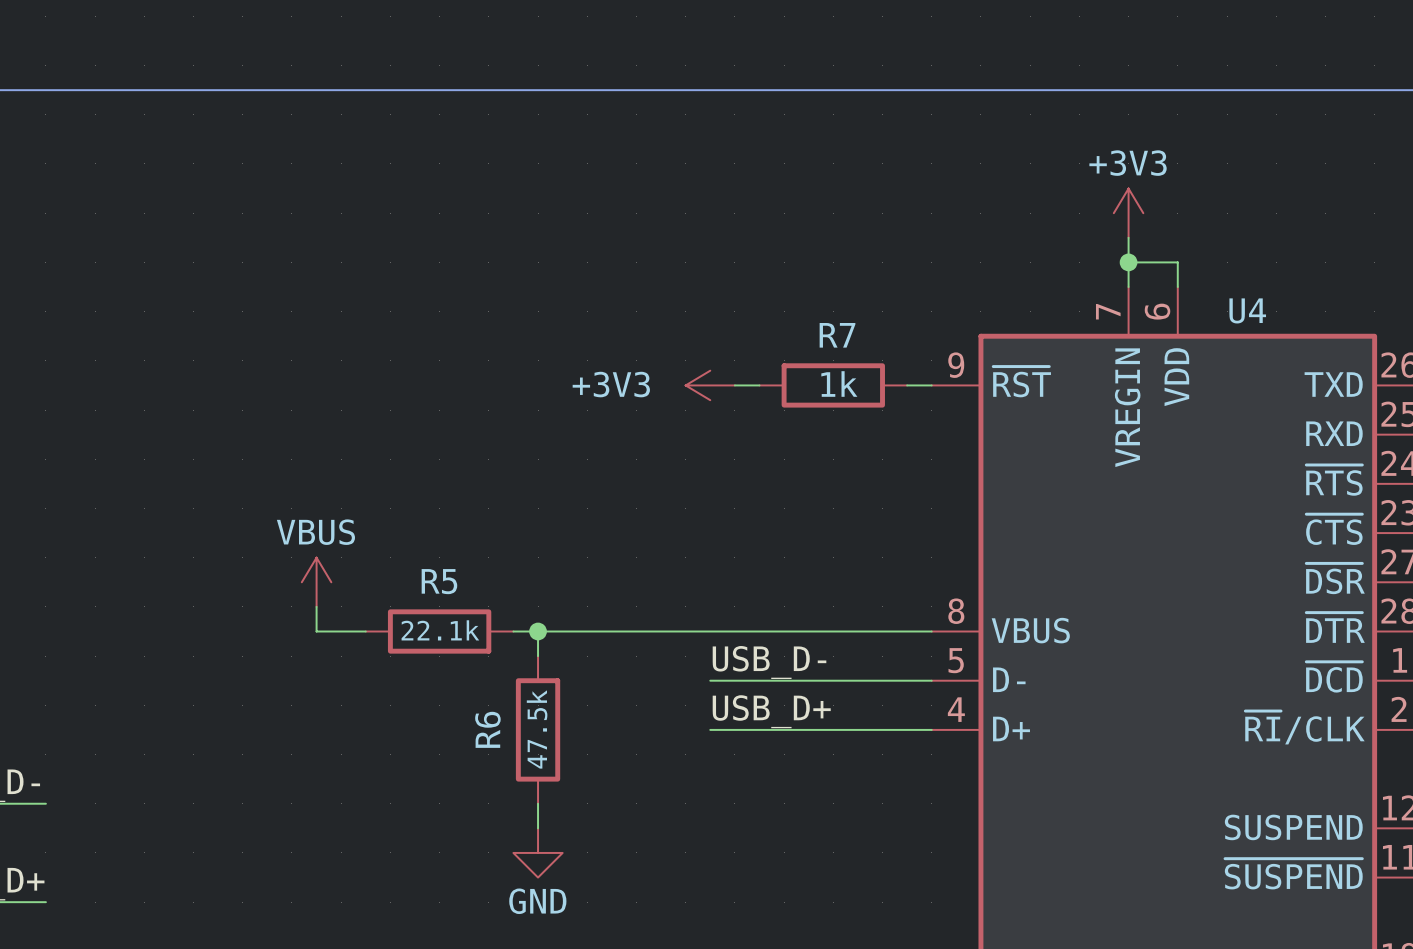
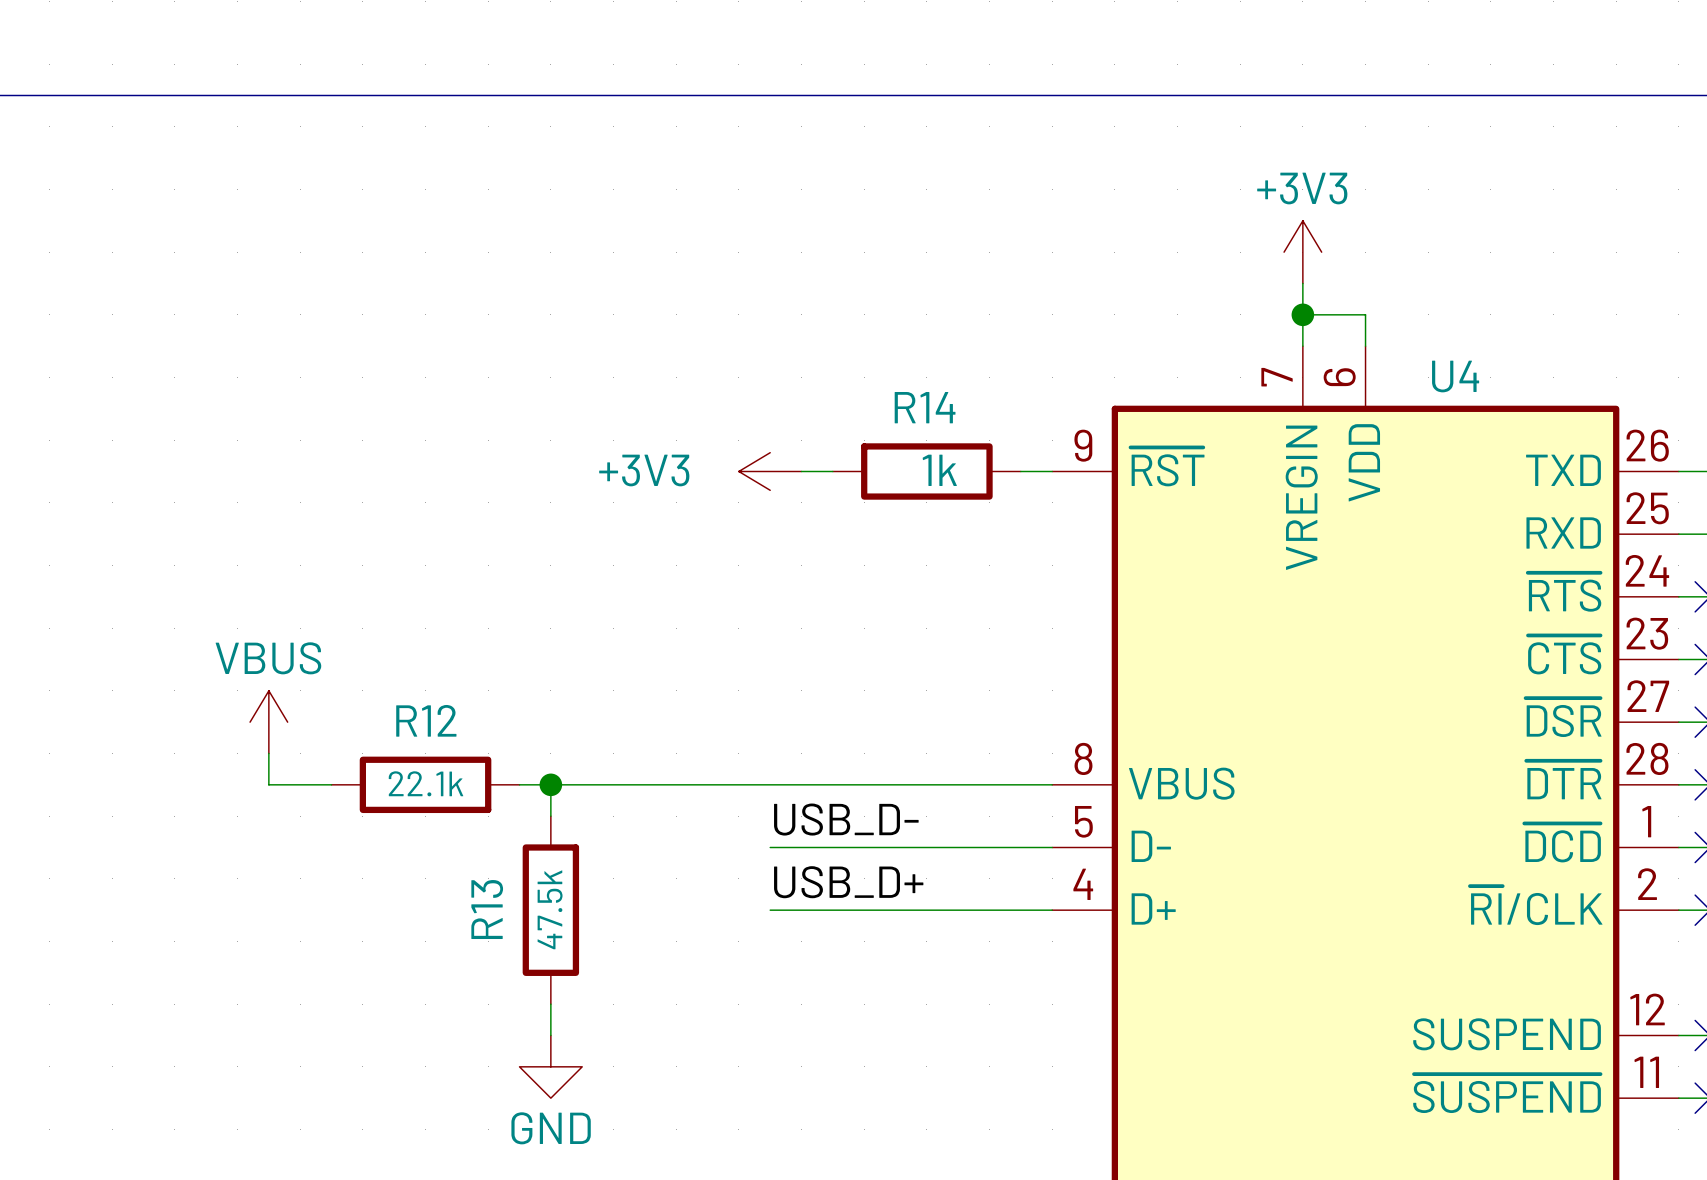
R7 name: R7 (837, 335) -> R14 (925, 407)
R5 name: R5 (439, 581) -> R12 (426, 720)
R6 name: R6 (487, 729) -> R13 (487, 909)

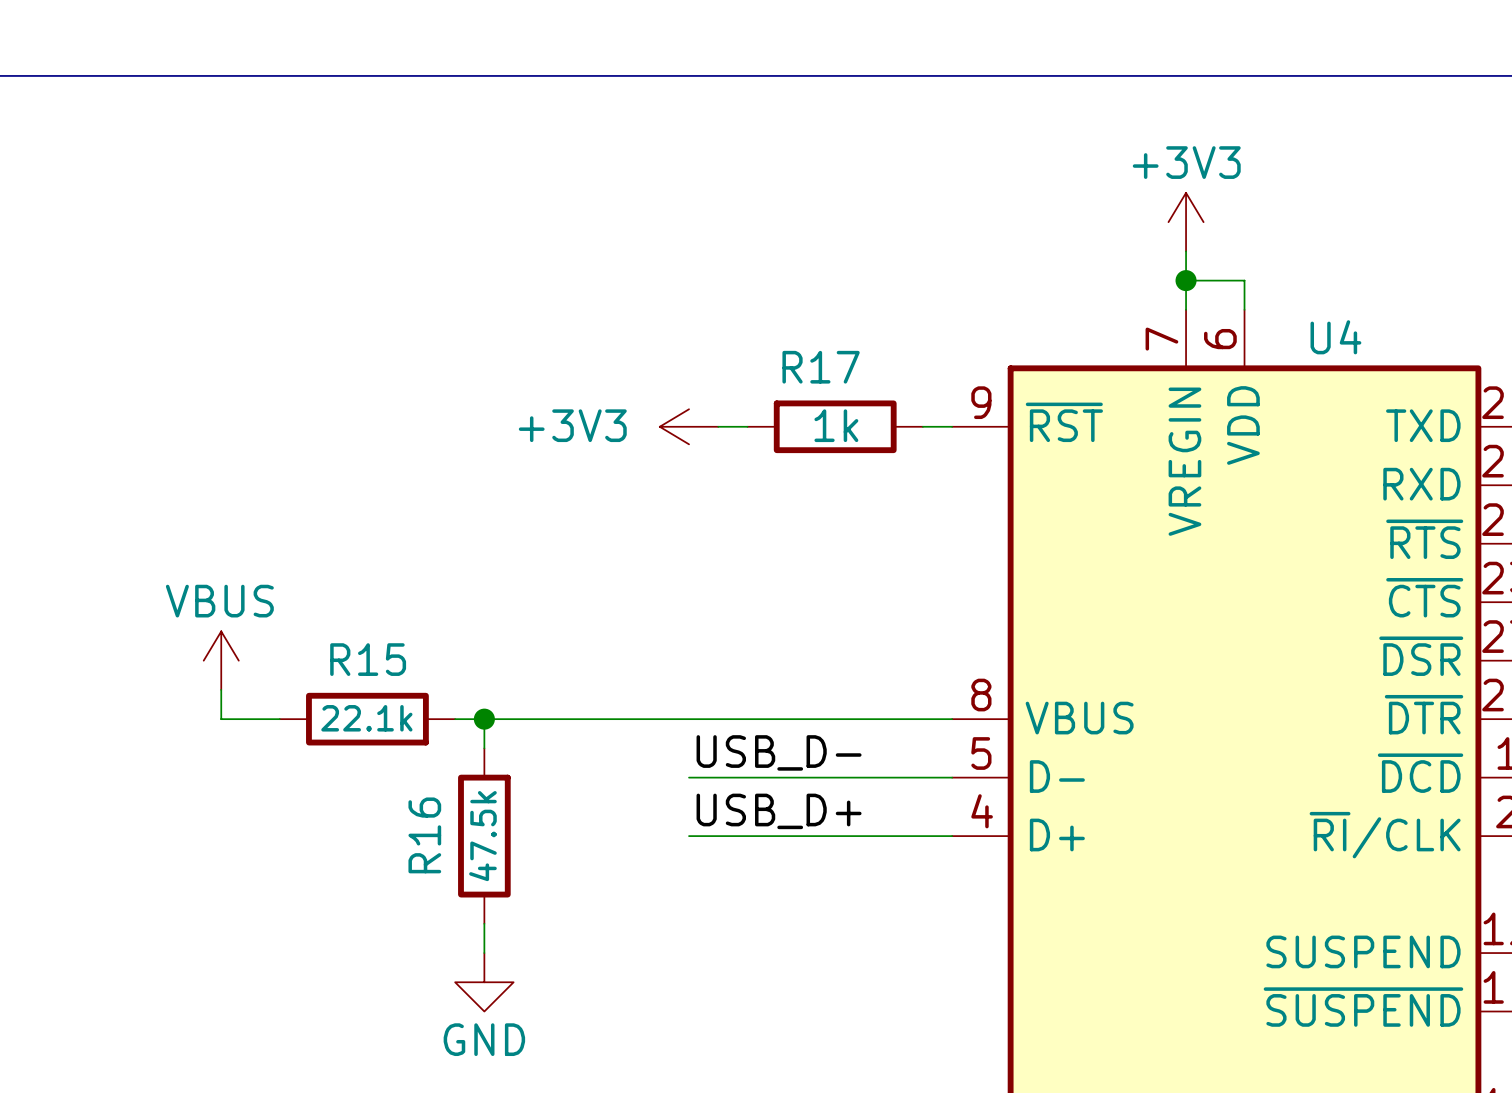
R14 name: R14 (925, 407) -> R17 (821, 367)
R12 name: R12 (426, 720) -> R15 (368, 659)
R13 name: R13 (487, 909) -> R16 (424, 835)

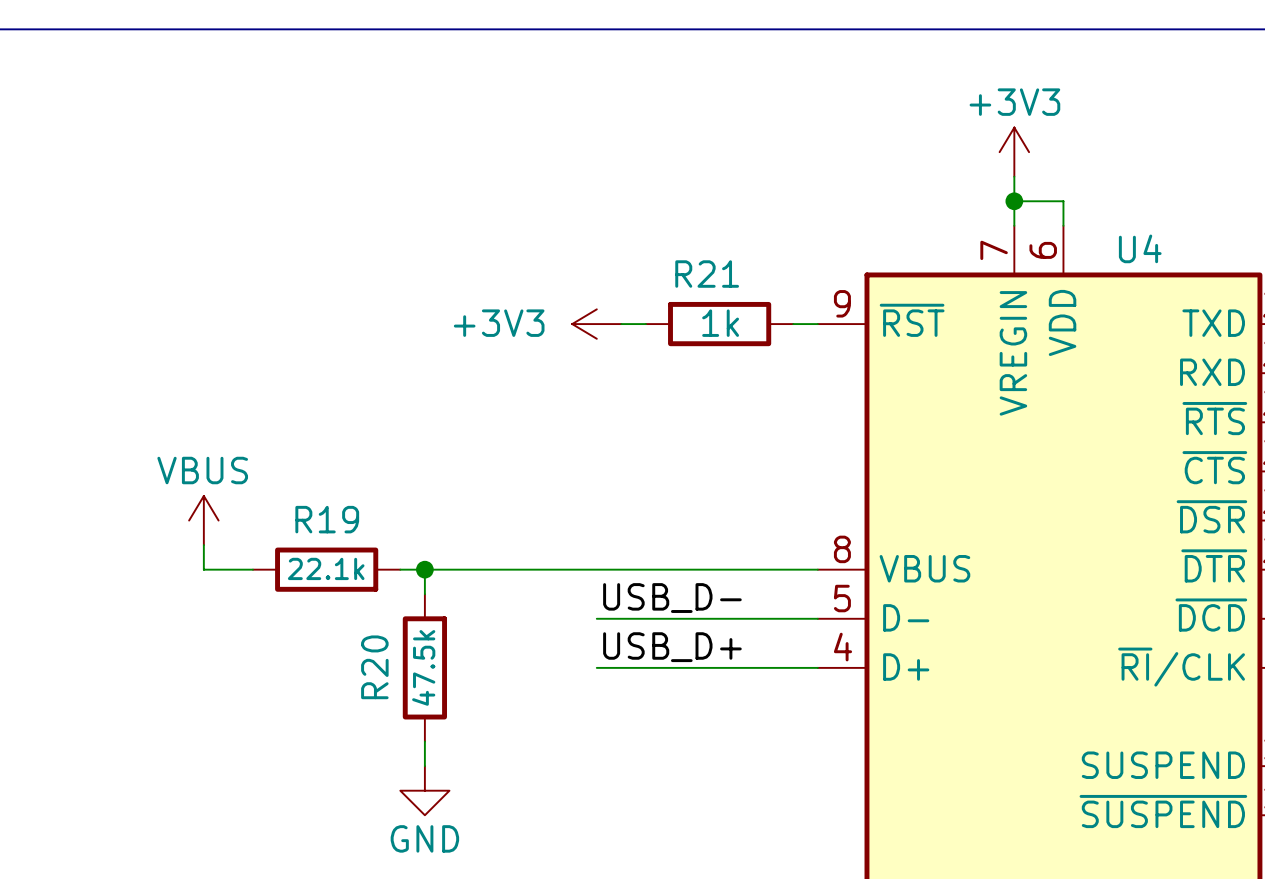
R17 name: R17 (821, 367) -> R21 (707, 274)
R15 name: R15 (368, 659) -> R19 (327, 519)
R16 name: R16 (424, 835) -> R20 (374, 667)

